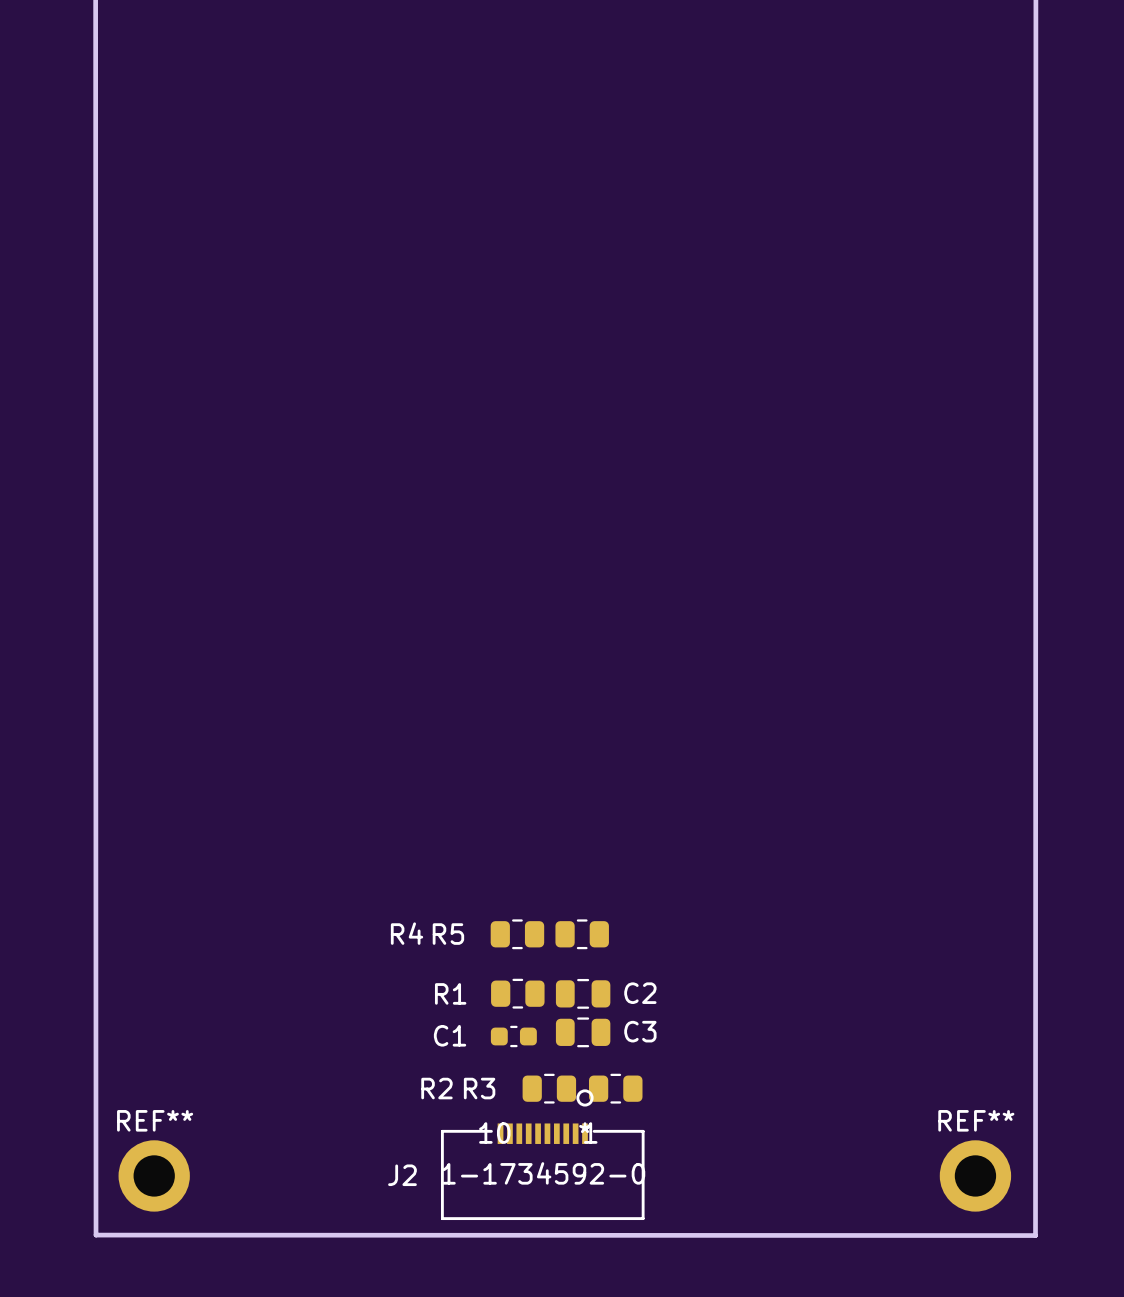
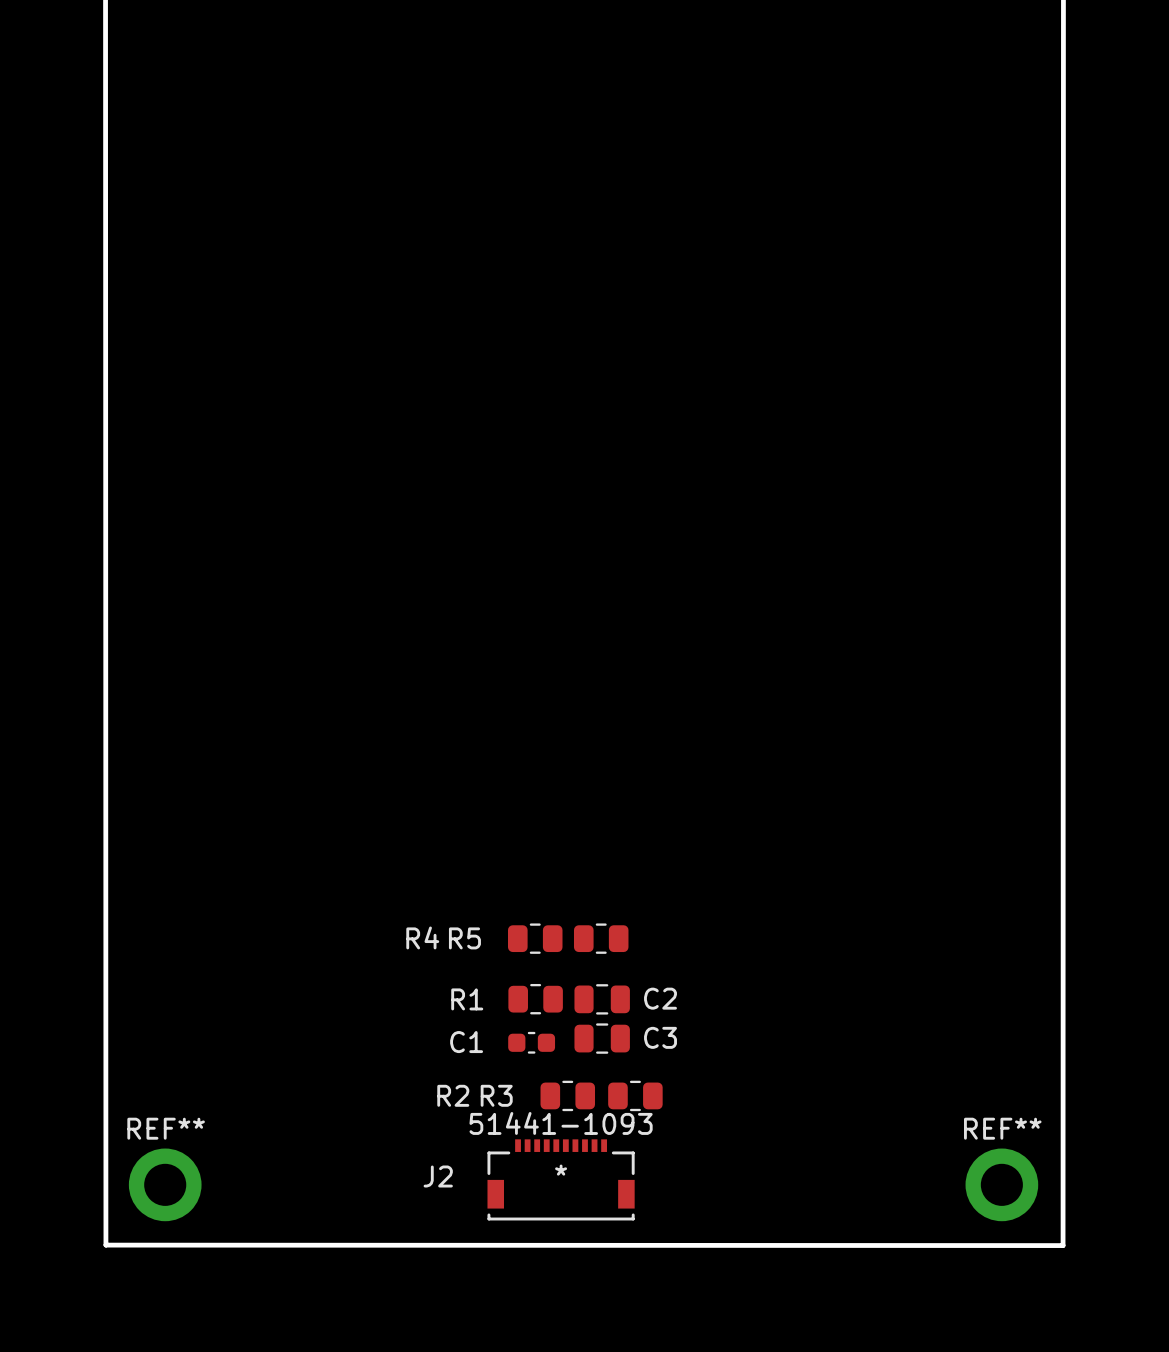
J2 footprint: [440, 1089, 645, 1221] -> [487, 1139, 635, 1221]
J2 value: 1-1734592-0 (543, 1173) -> 51441-1093 (561, 1123)

